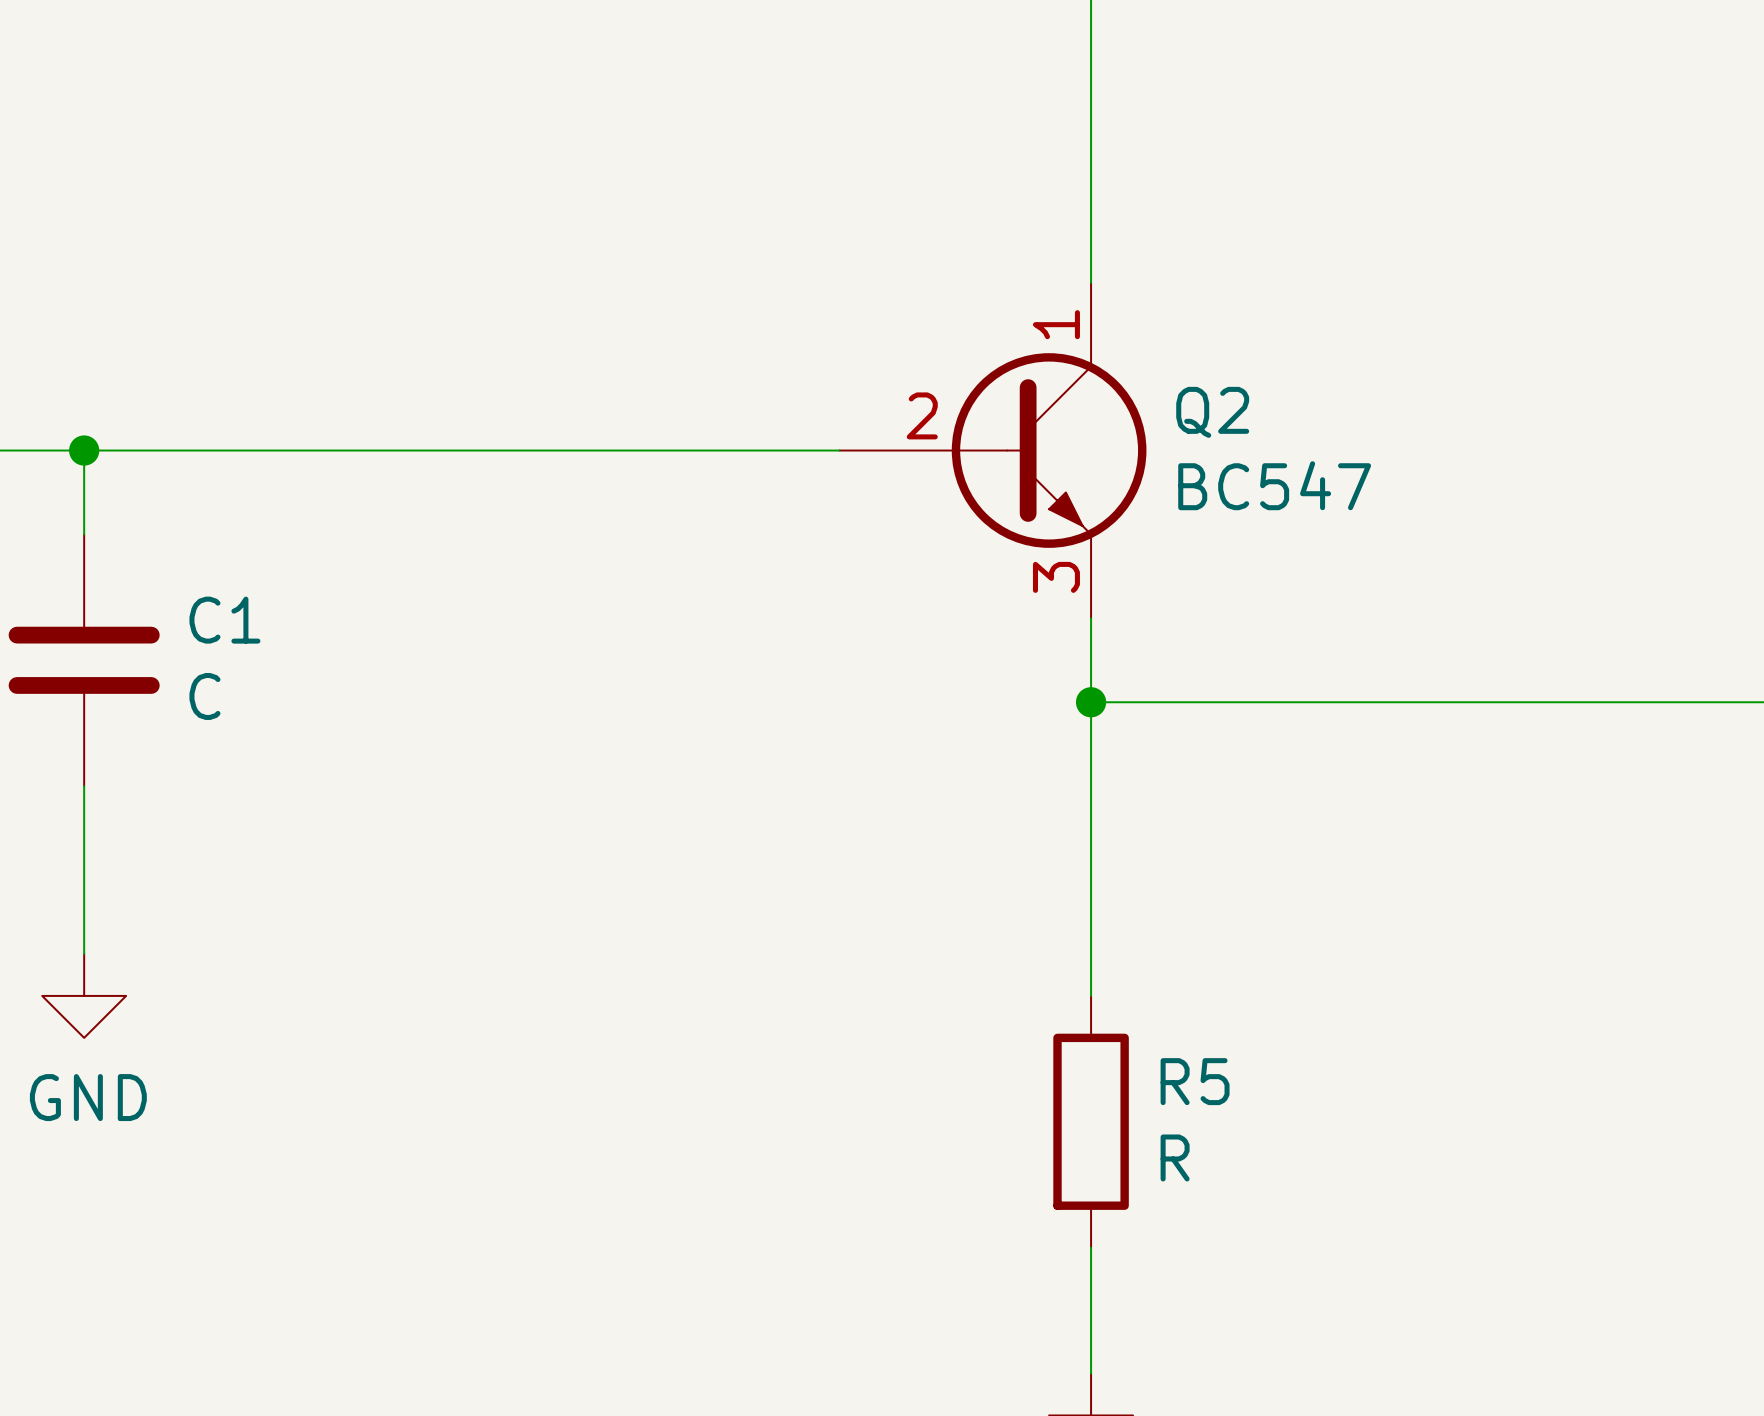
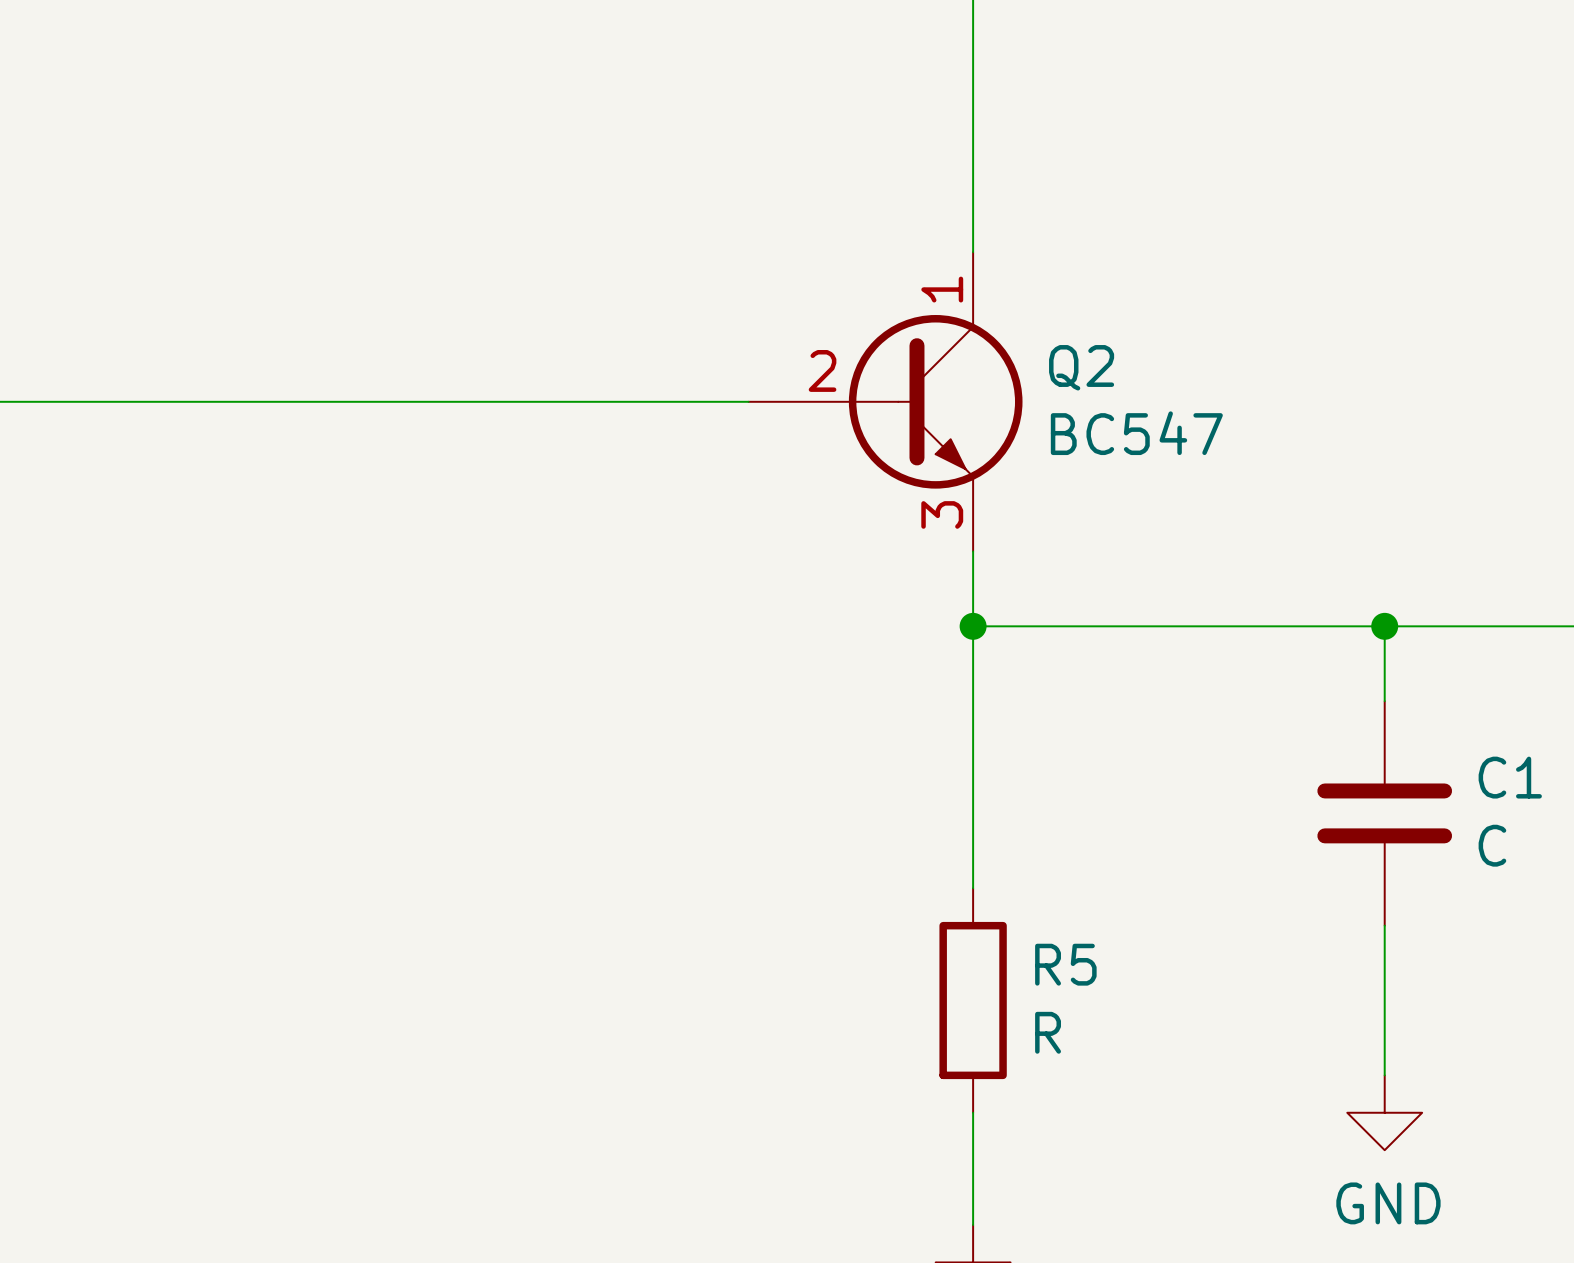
wire: (84, 450) (84, 534) -> none
junction: (84, 450) -> none
C1 position: (84, 660) -> (1384, 813)
wire: none -> (1384, 626) (1384, 701)
junction: none -> (1384, 626)
wire: (84, 786) (84, 953) -> none
power symbol: GND (84, 995) -> none
wire: none -> (1384, 925) (1384, 1075)
power symbol: none -> GND (1384, 1112)

